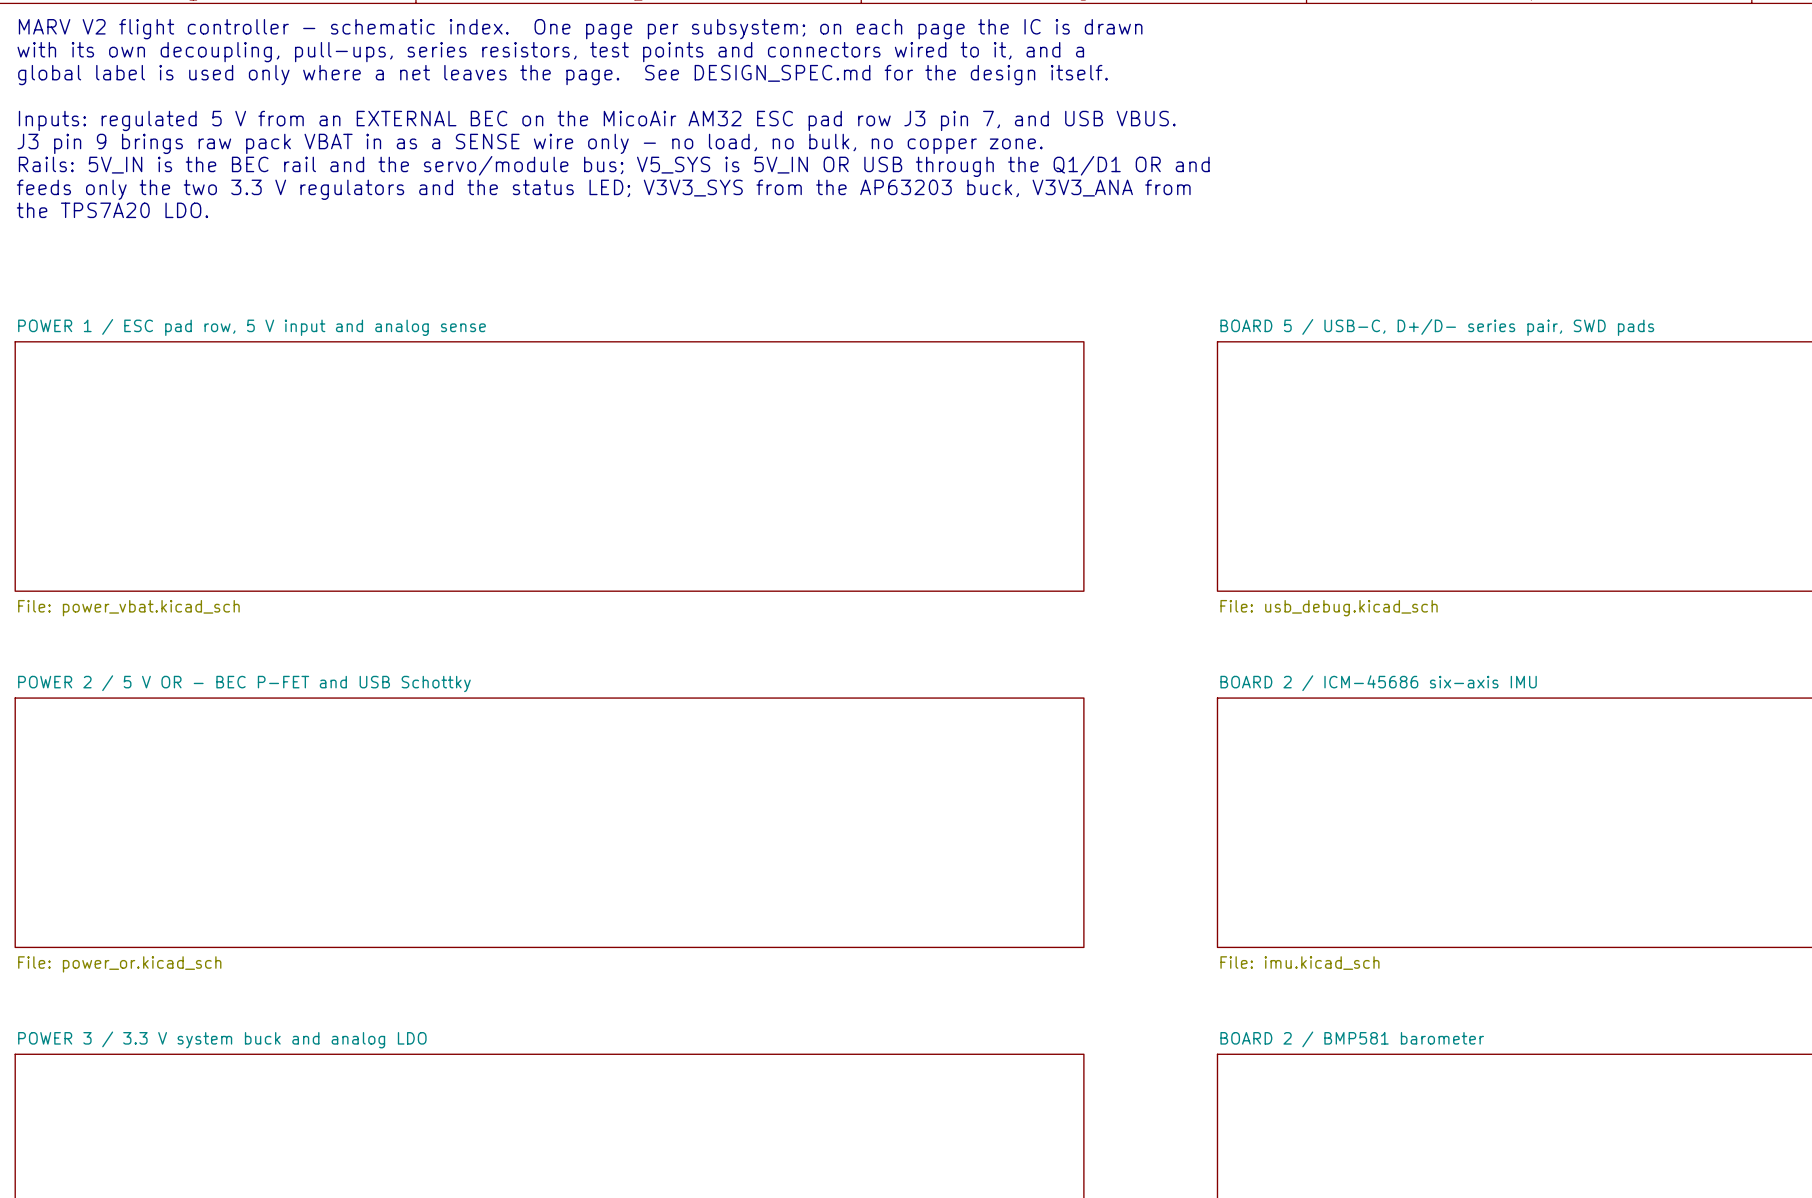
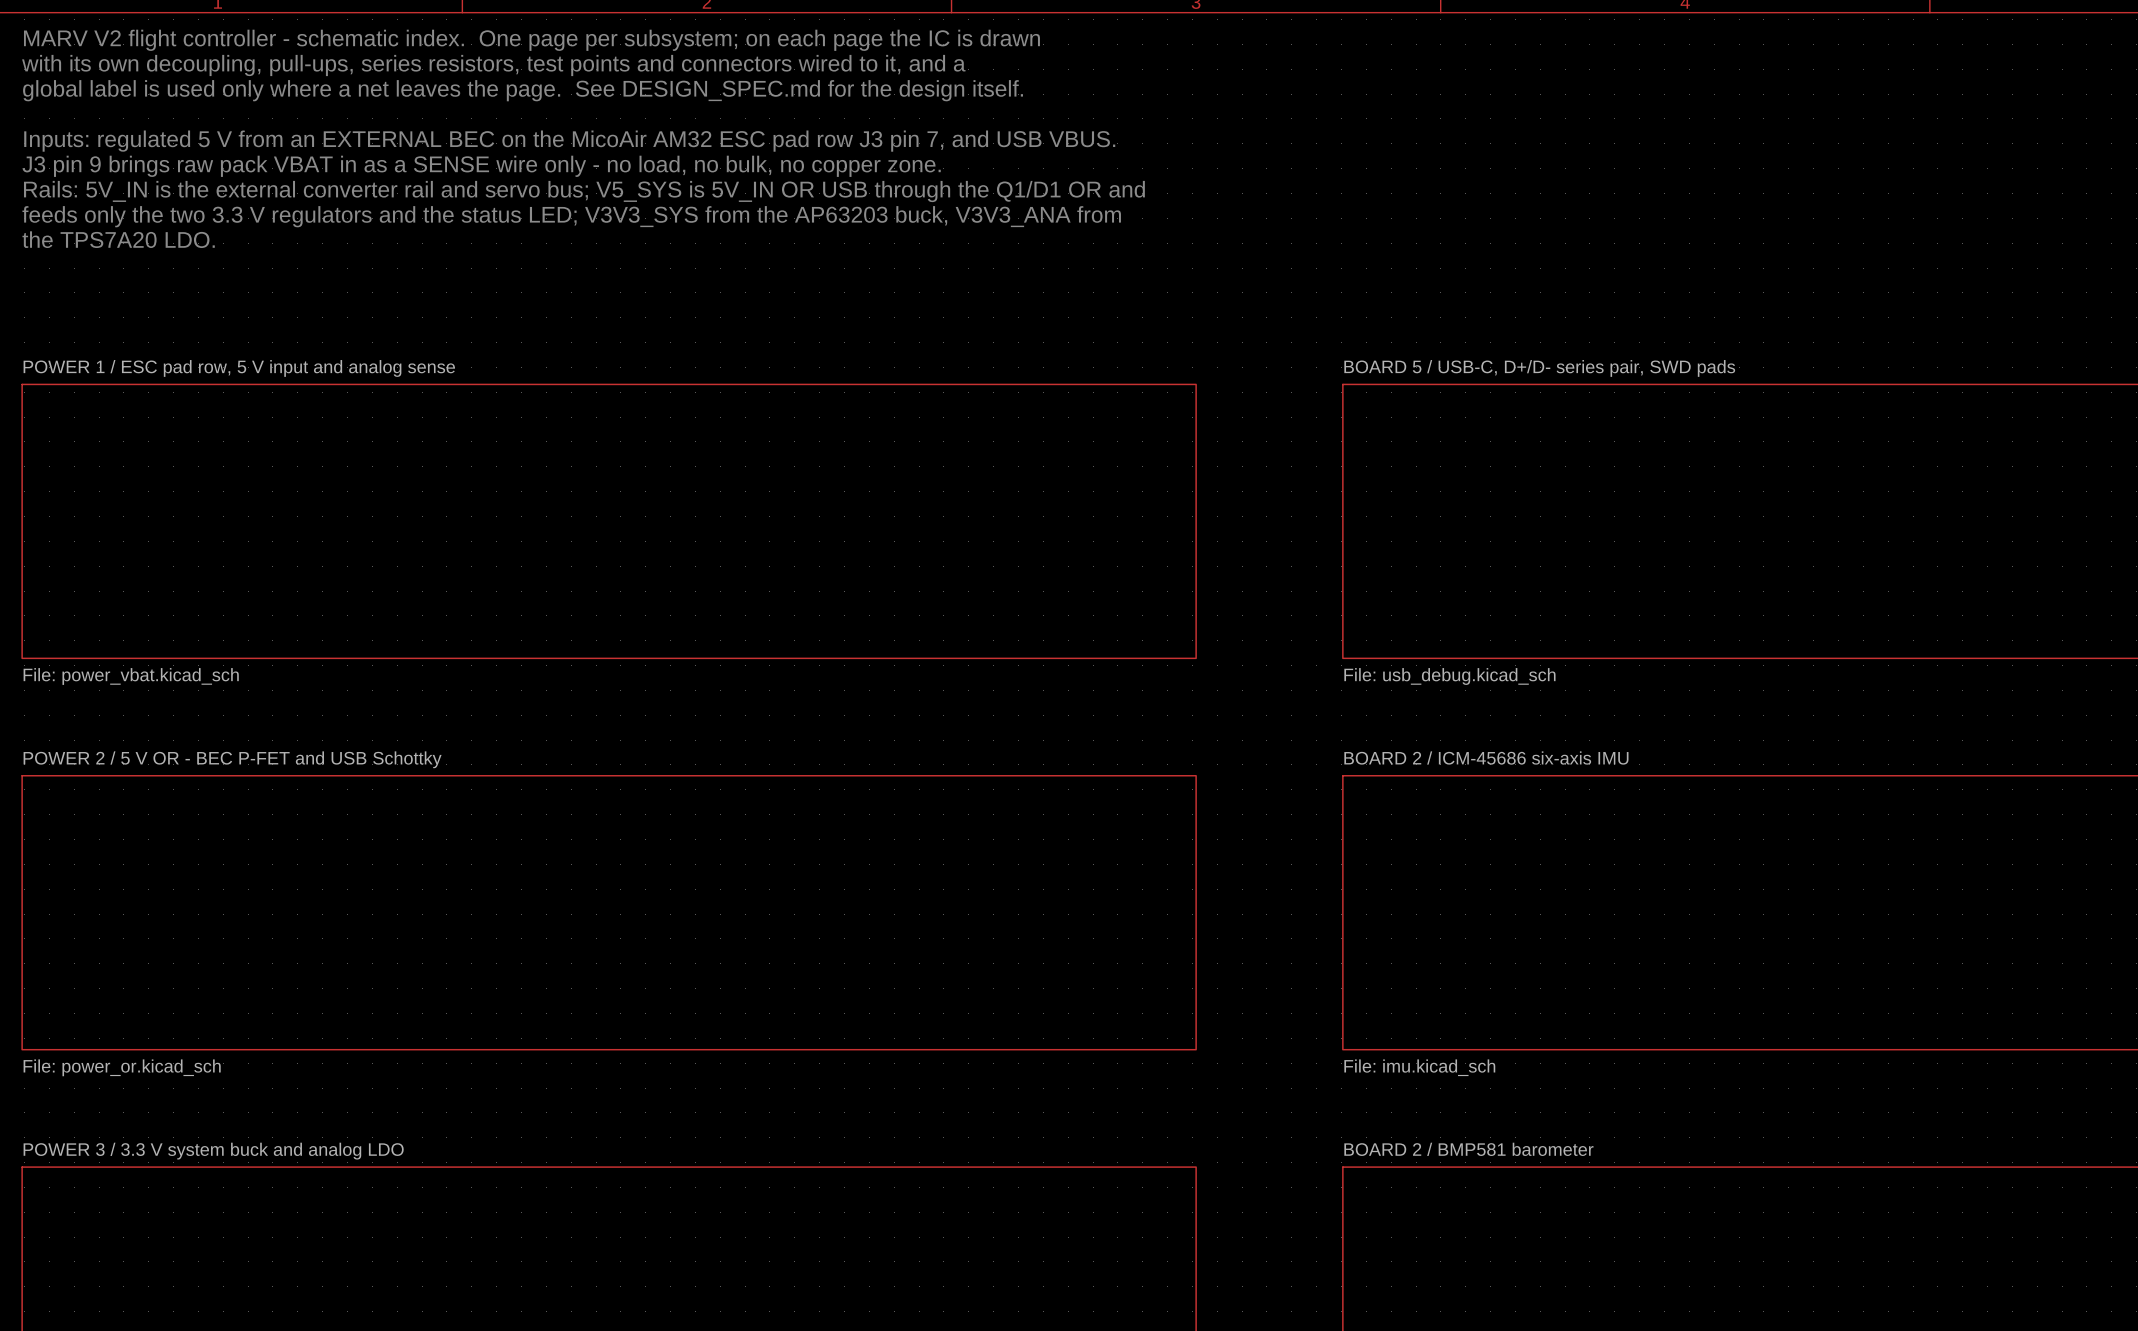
text: Rails: 5V_IN is the BEC rail and the servo/module bus; V5_SYS is 5V_IN OR USB through the Q1/D1 OR and (614, 166) -> Rails: 5V_IN is the external converter rail and servo bus; V5_SYS is 5V_IN OR USB through the Q1/D1 OR and (584, 191)

